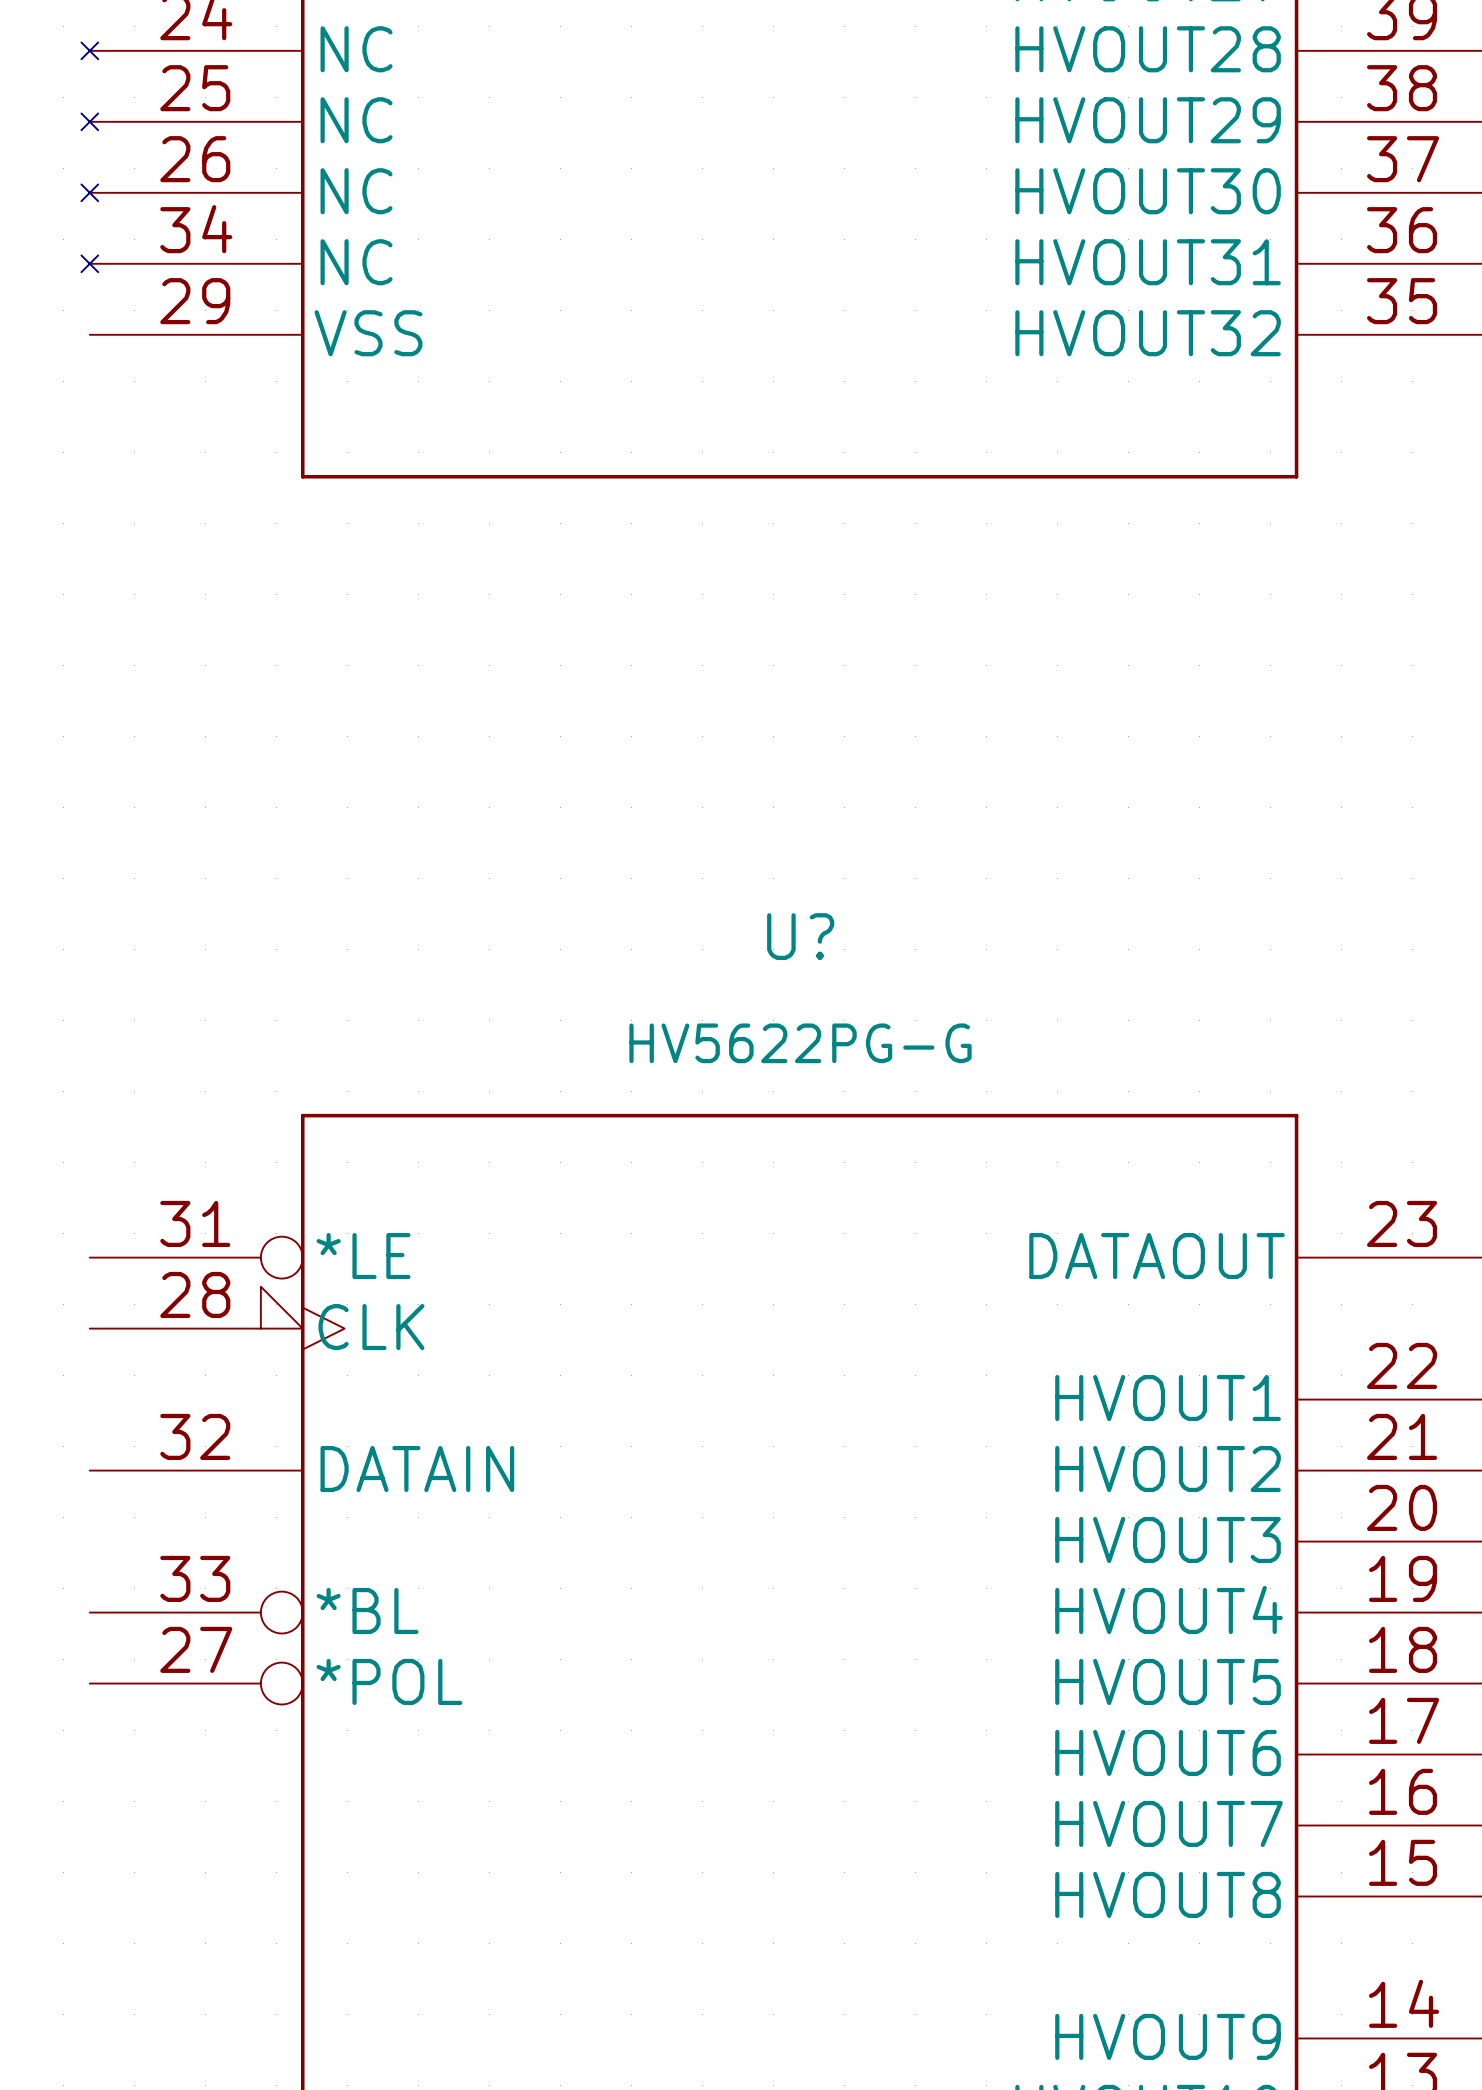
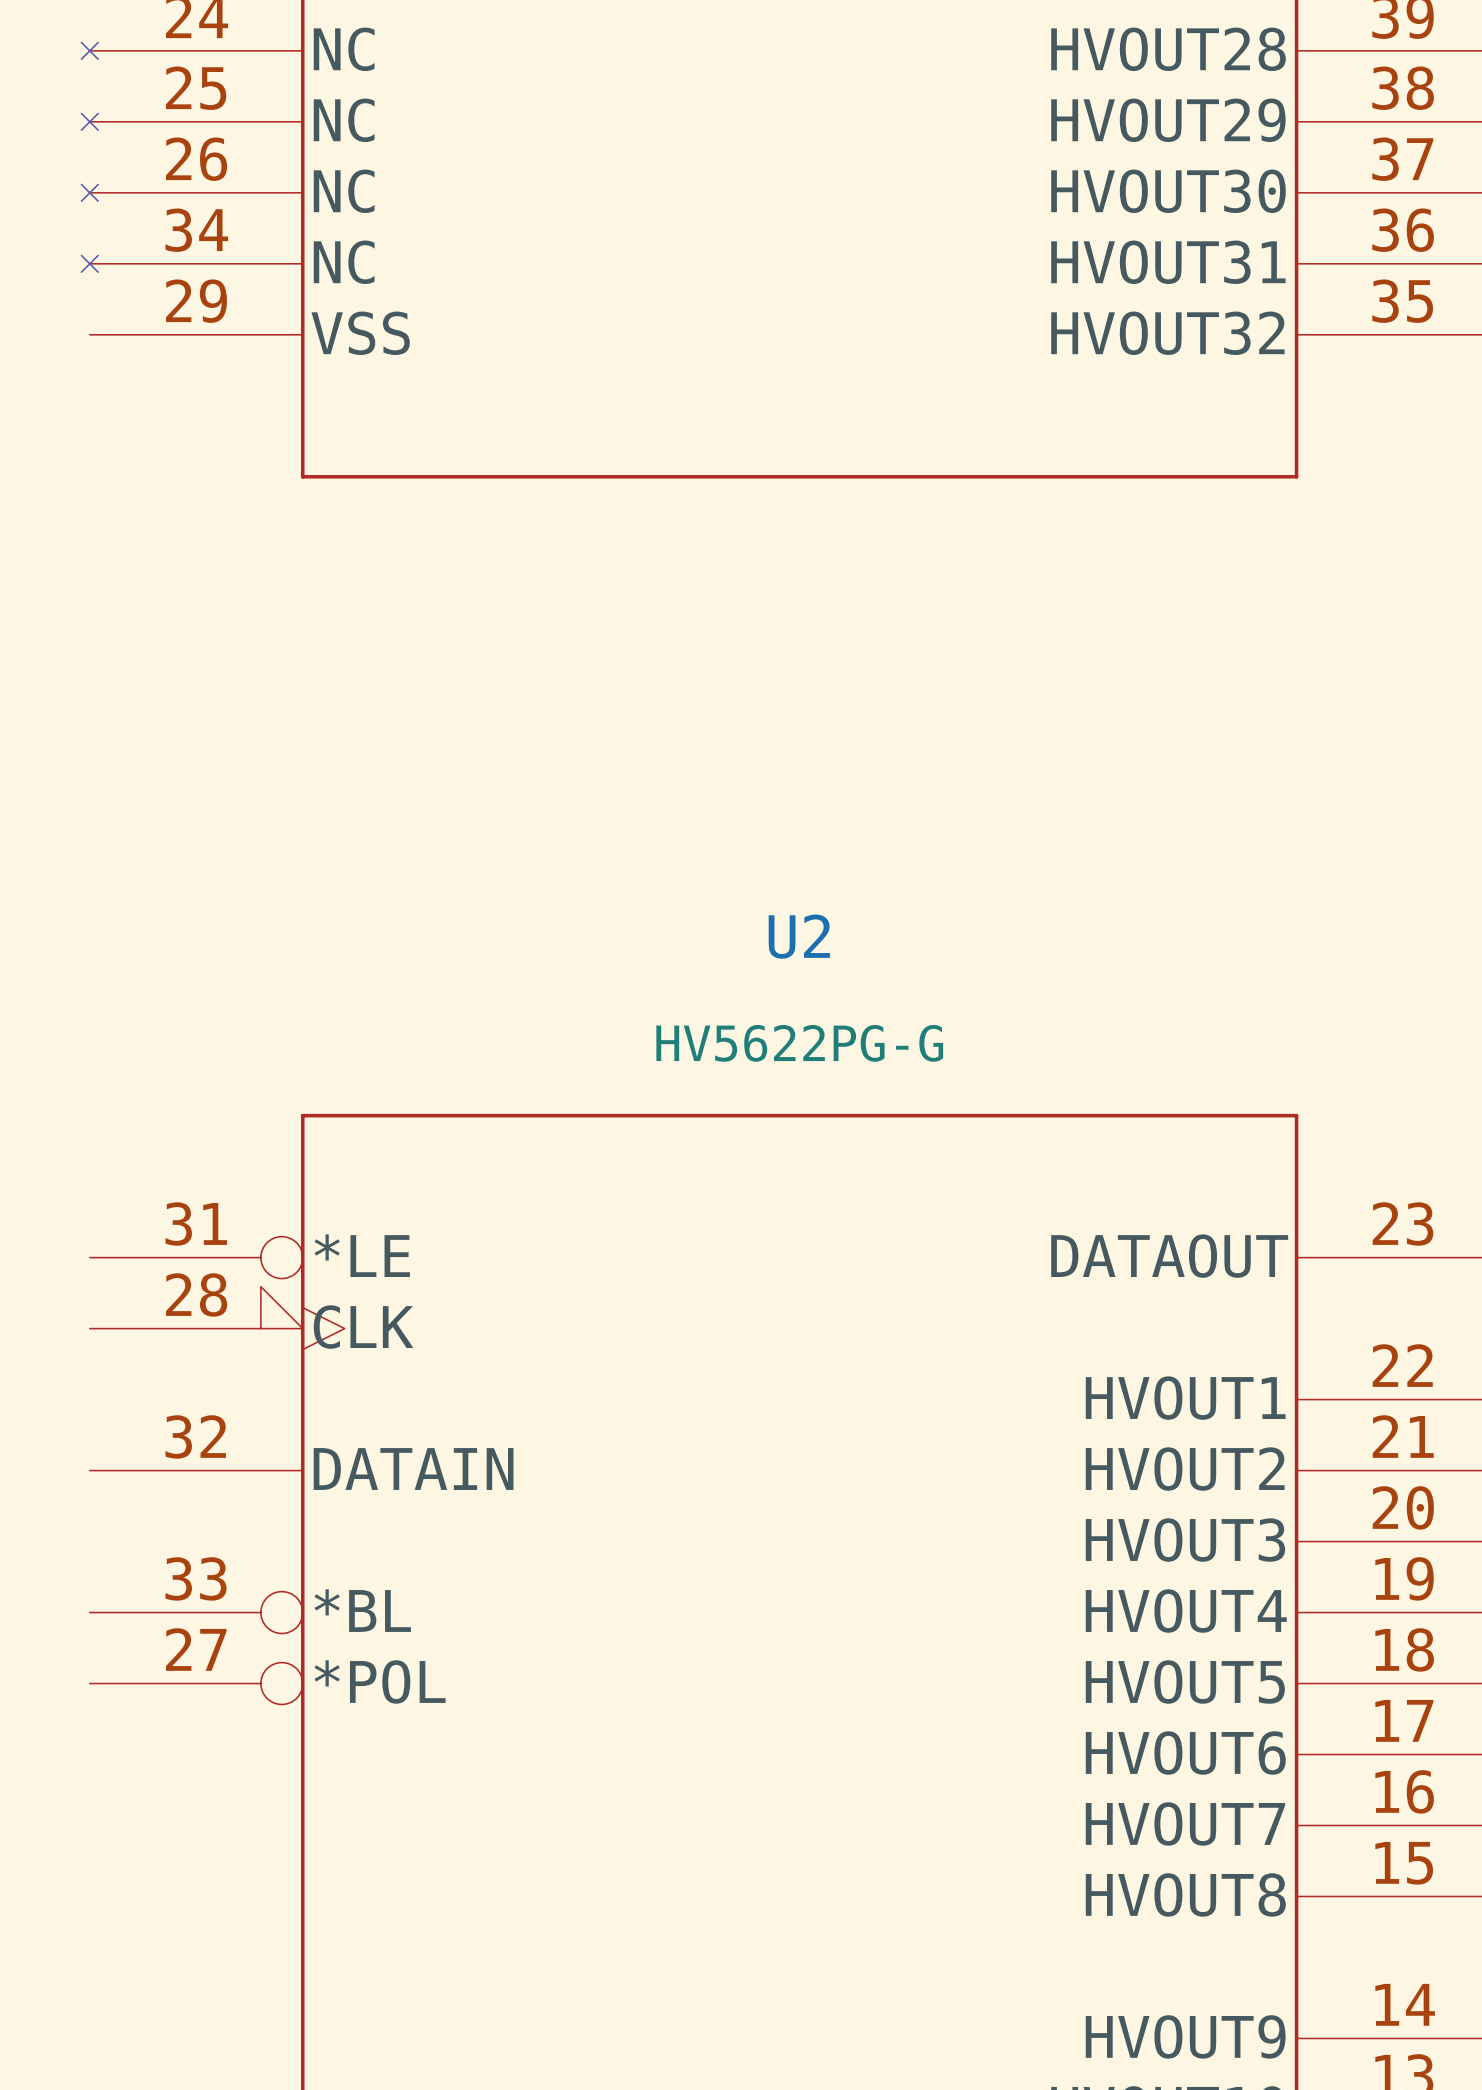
U? name: U? (800, 936) -> U2 (799, 936)

